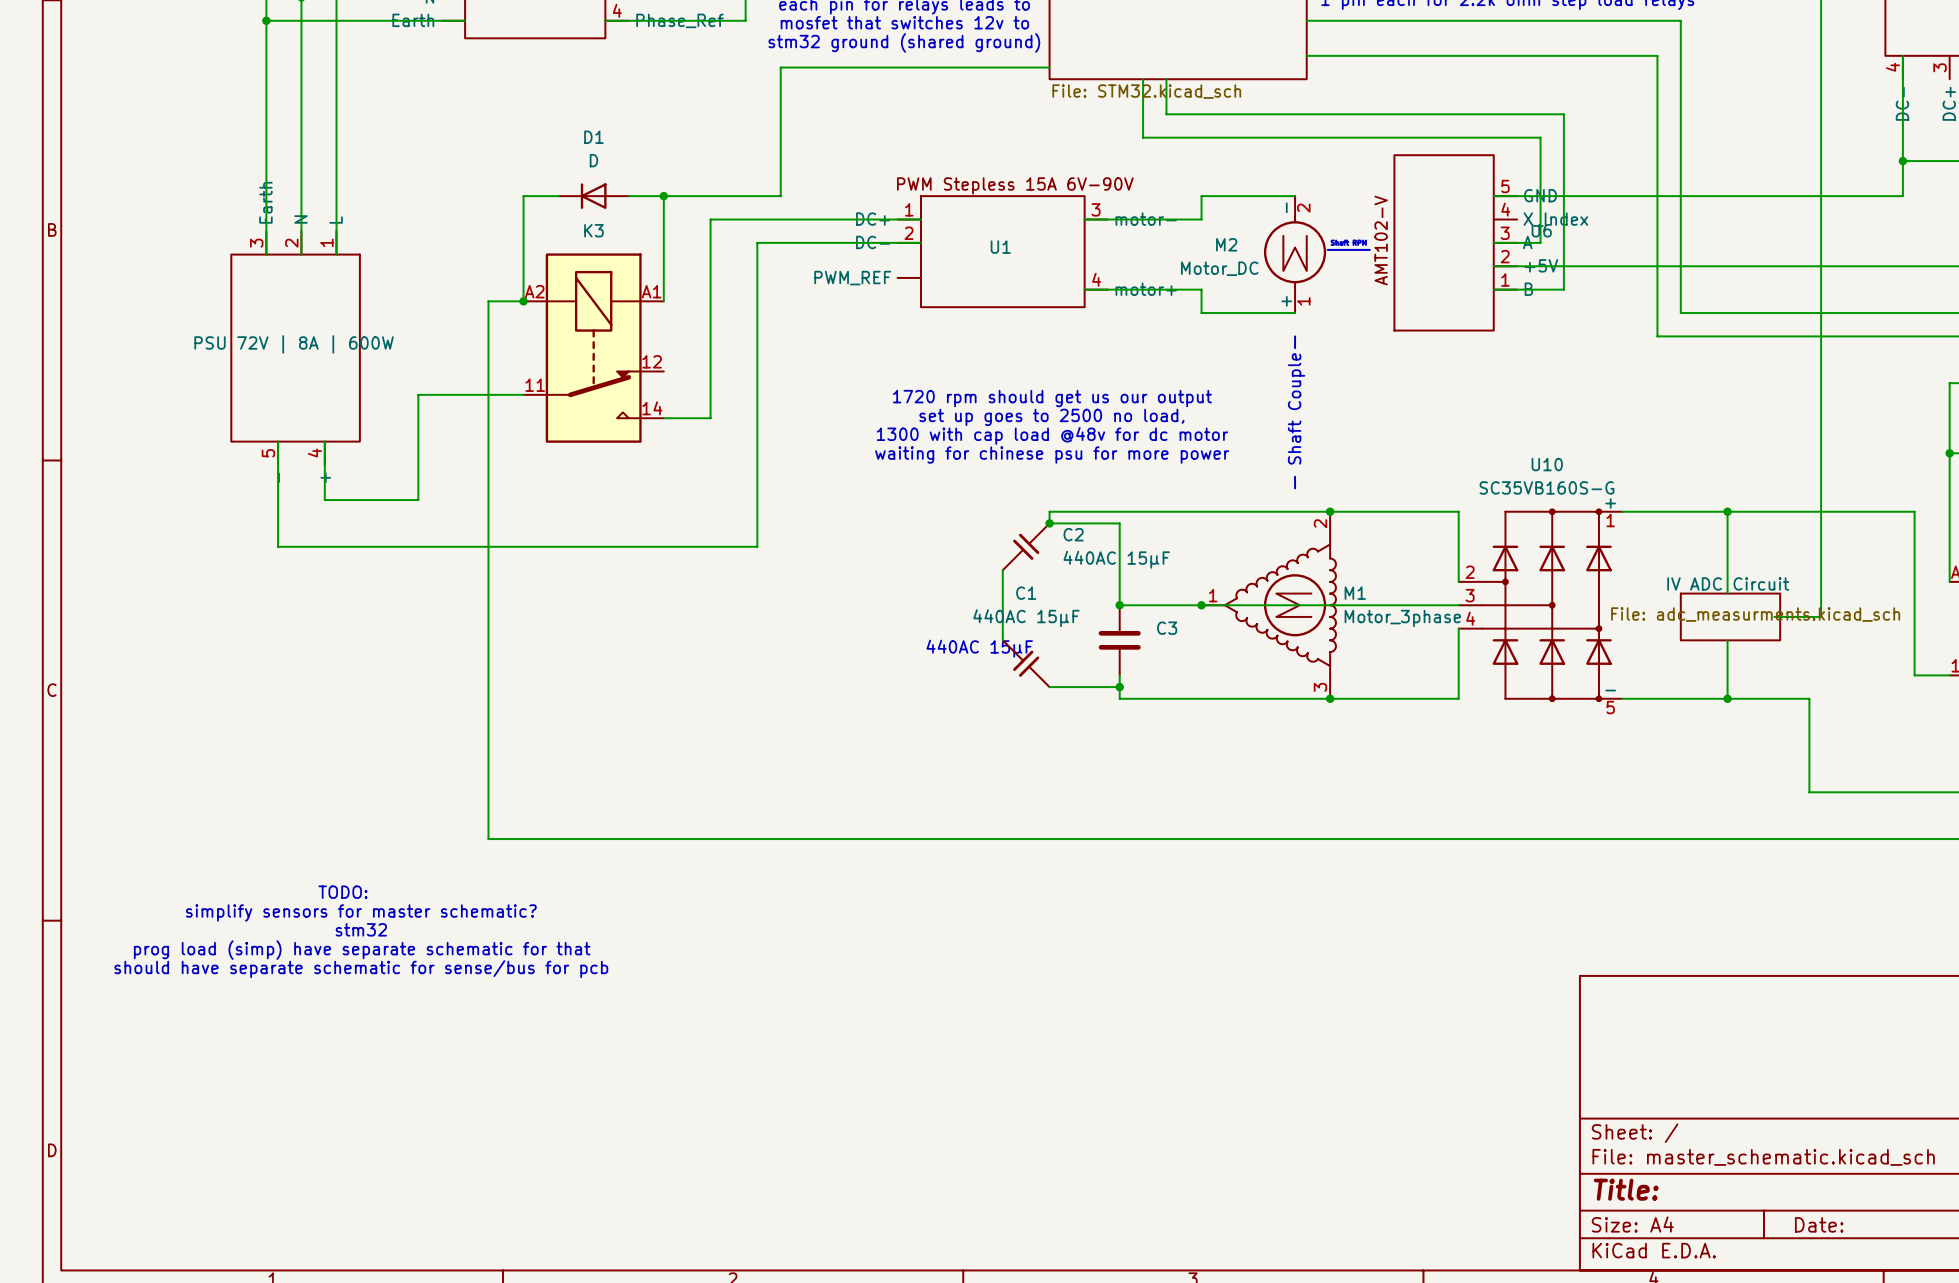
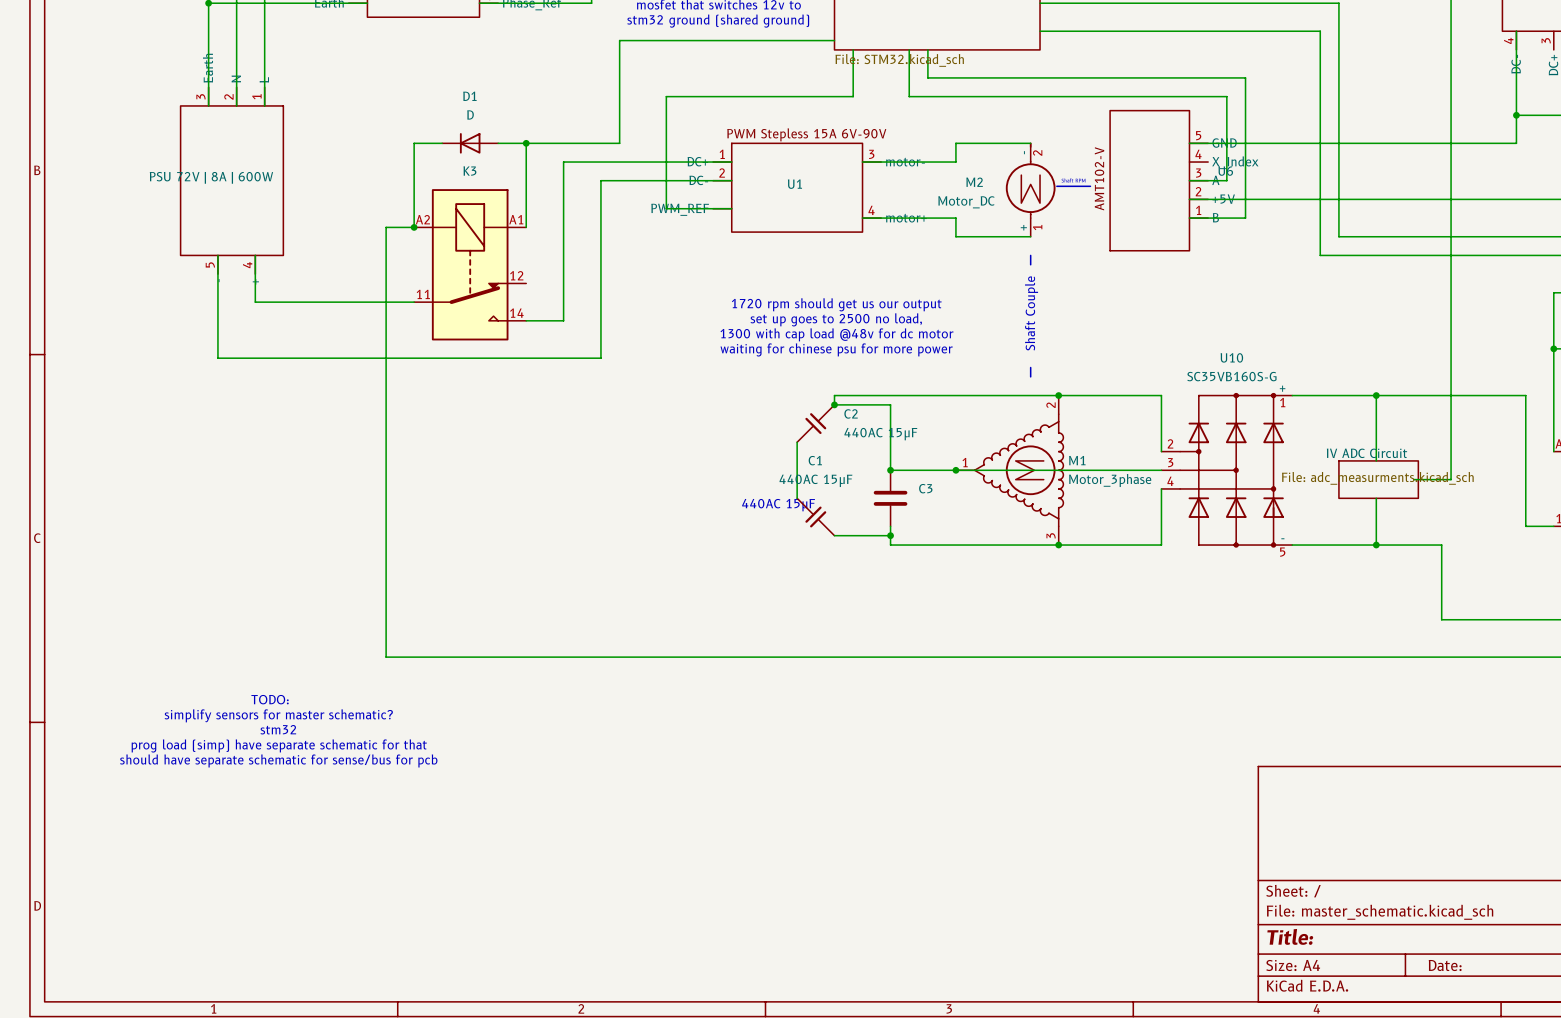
wire: none -> (853, 49) (853, 96) (666, 96) (666, 208) (731, 208)
wire: (266, 149) (266, 254) -> (217, 255) (217, 339)
wire: (301, 149) (301, 254) -> none
wire: (336, 149) (336, 254) -> none
PSU 72V | 8A | 600W position: (295, 348) -> (231, 180)
wire: (418, 394) (418, 500) (324, 500) (324, 441) -> (330, 302) (255, 302) (255, 255)
wire: (278, 464) (278, 546) (757, 546) (757, 464) -> (217, 358) (600, 358)

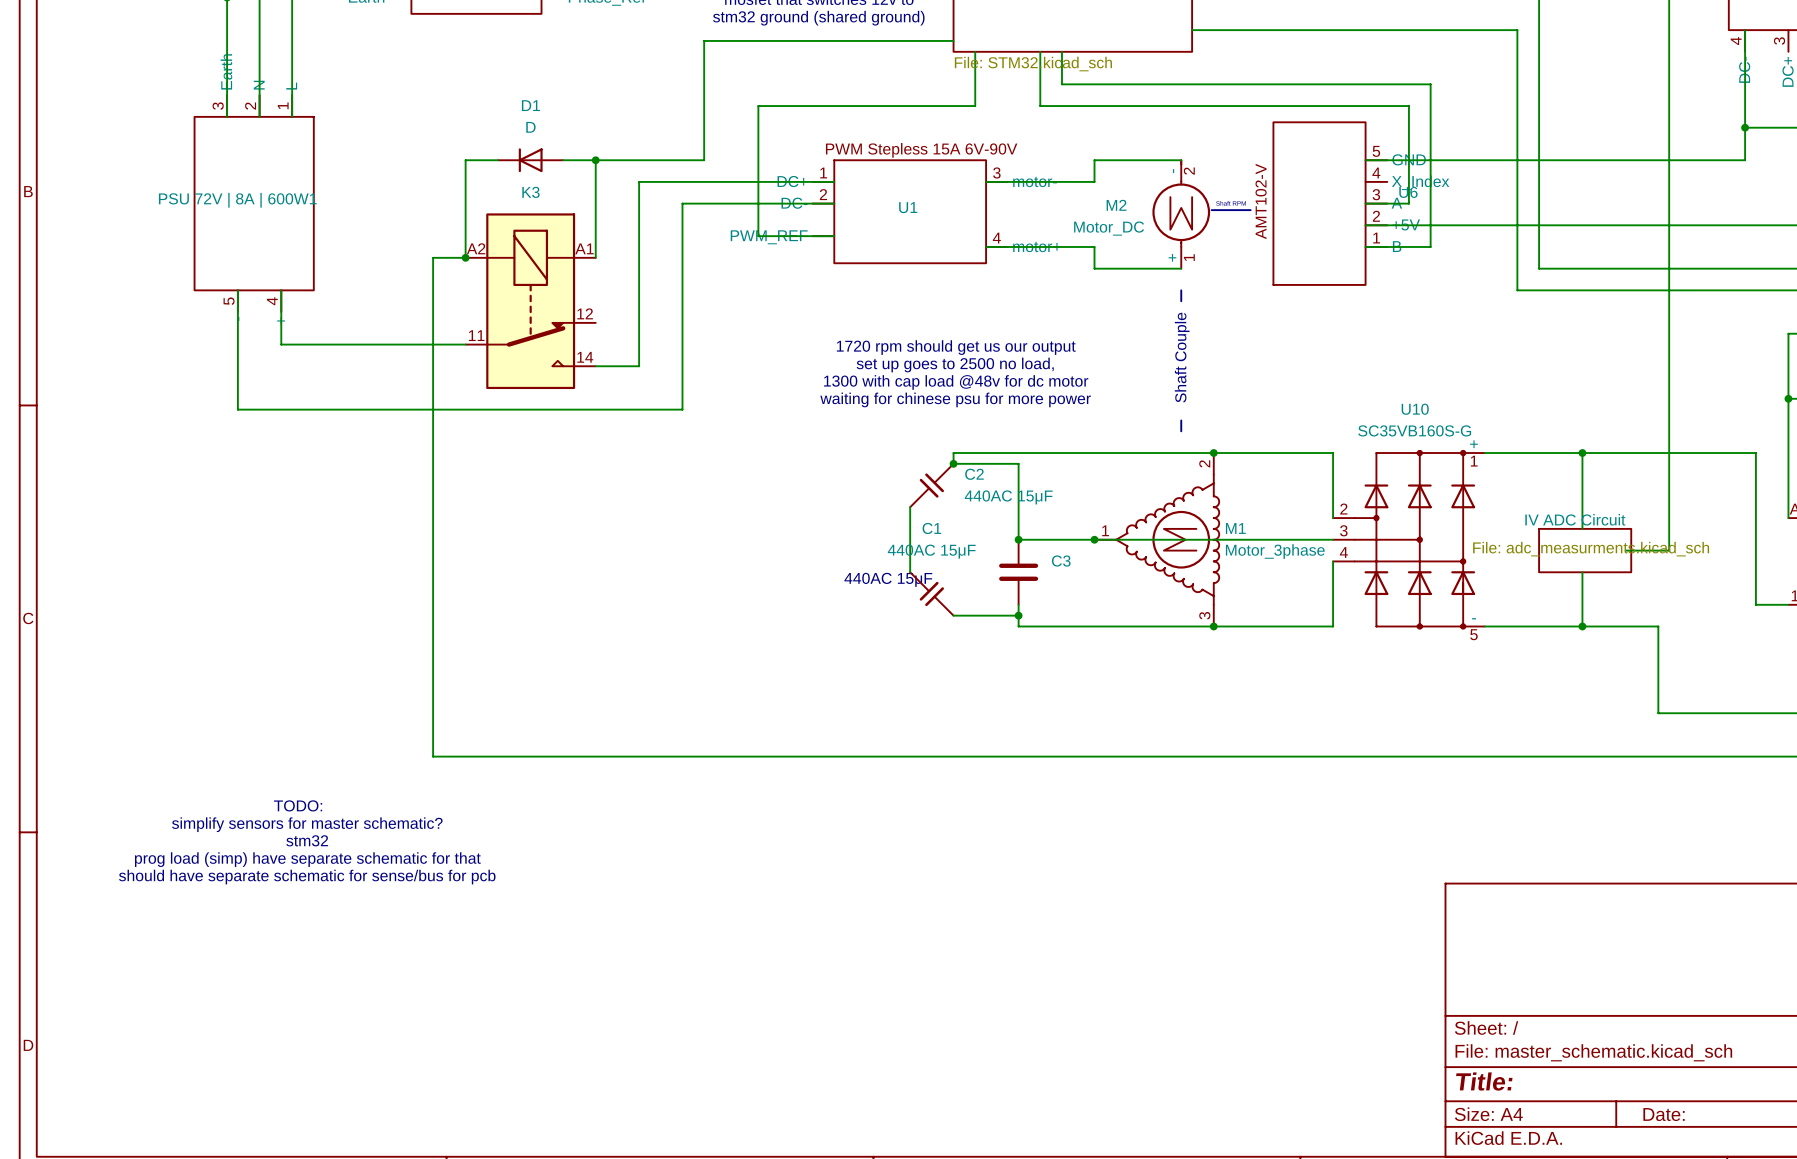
PSU 72V | 8A | 600W name: PSU 72V | 8A | 600W (211, 177) -> PSU 72V | 8A | 600W1 (237, 200)

